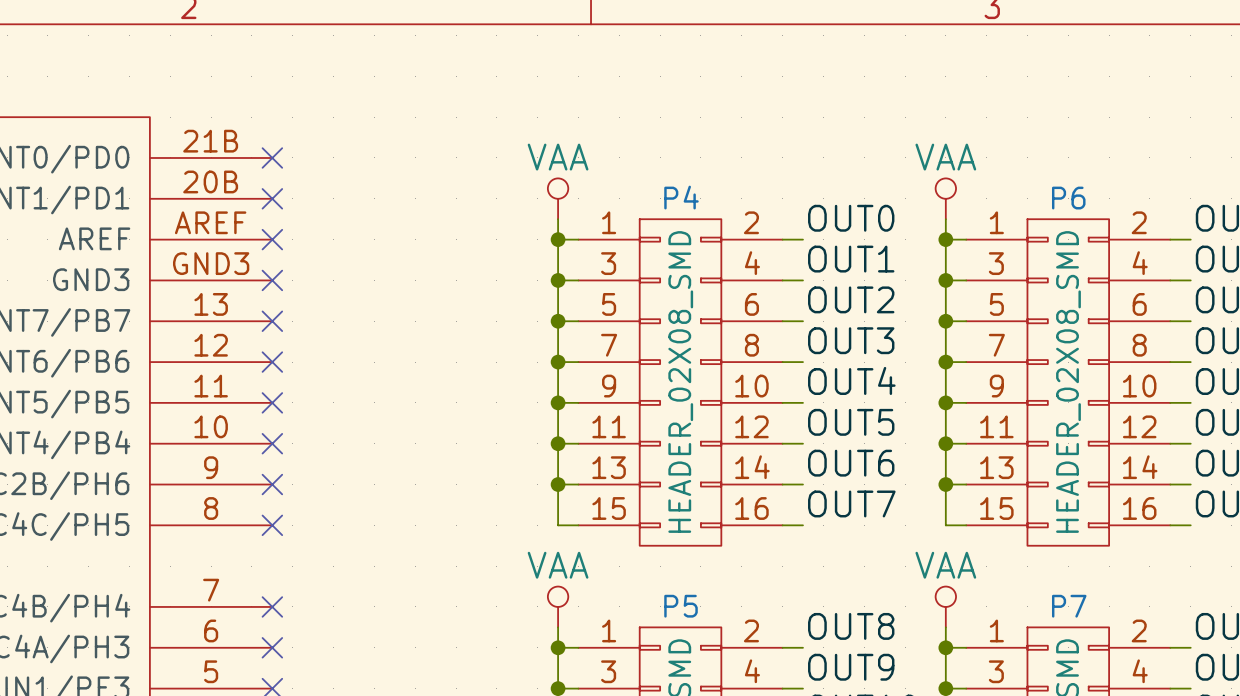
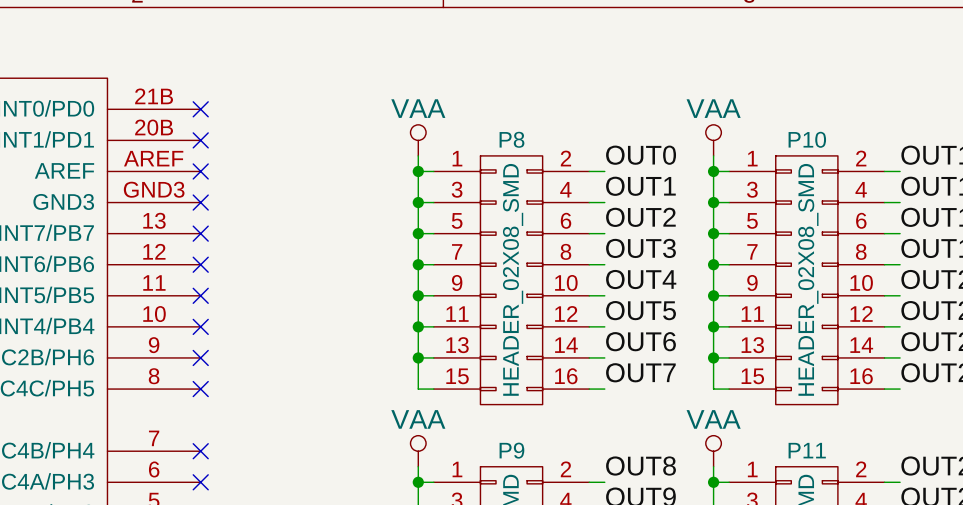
P4 name: P4 (681, 197) -> P8 (511, 139)
P6 name: P6 (1068, 198) -> P10 (807, 139)
P5 name: P5 (681, 606) -> P9 (511, 450)
P7 name: P7 (1069, 606) -> P11 (807, 450)

